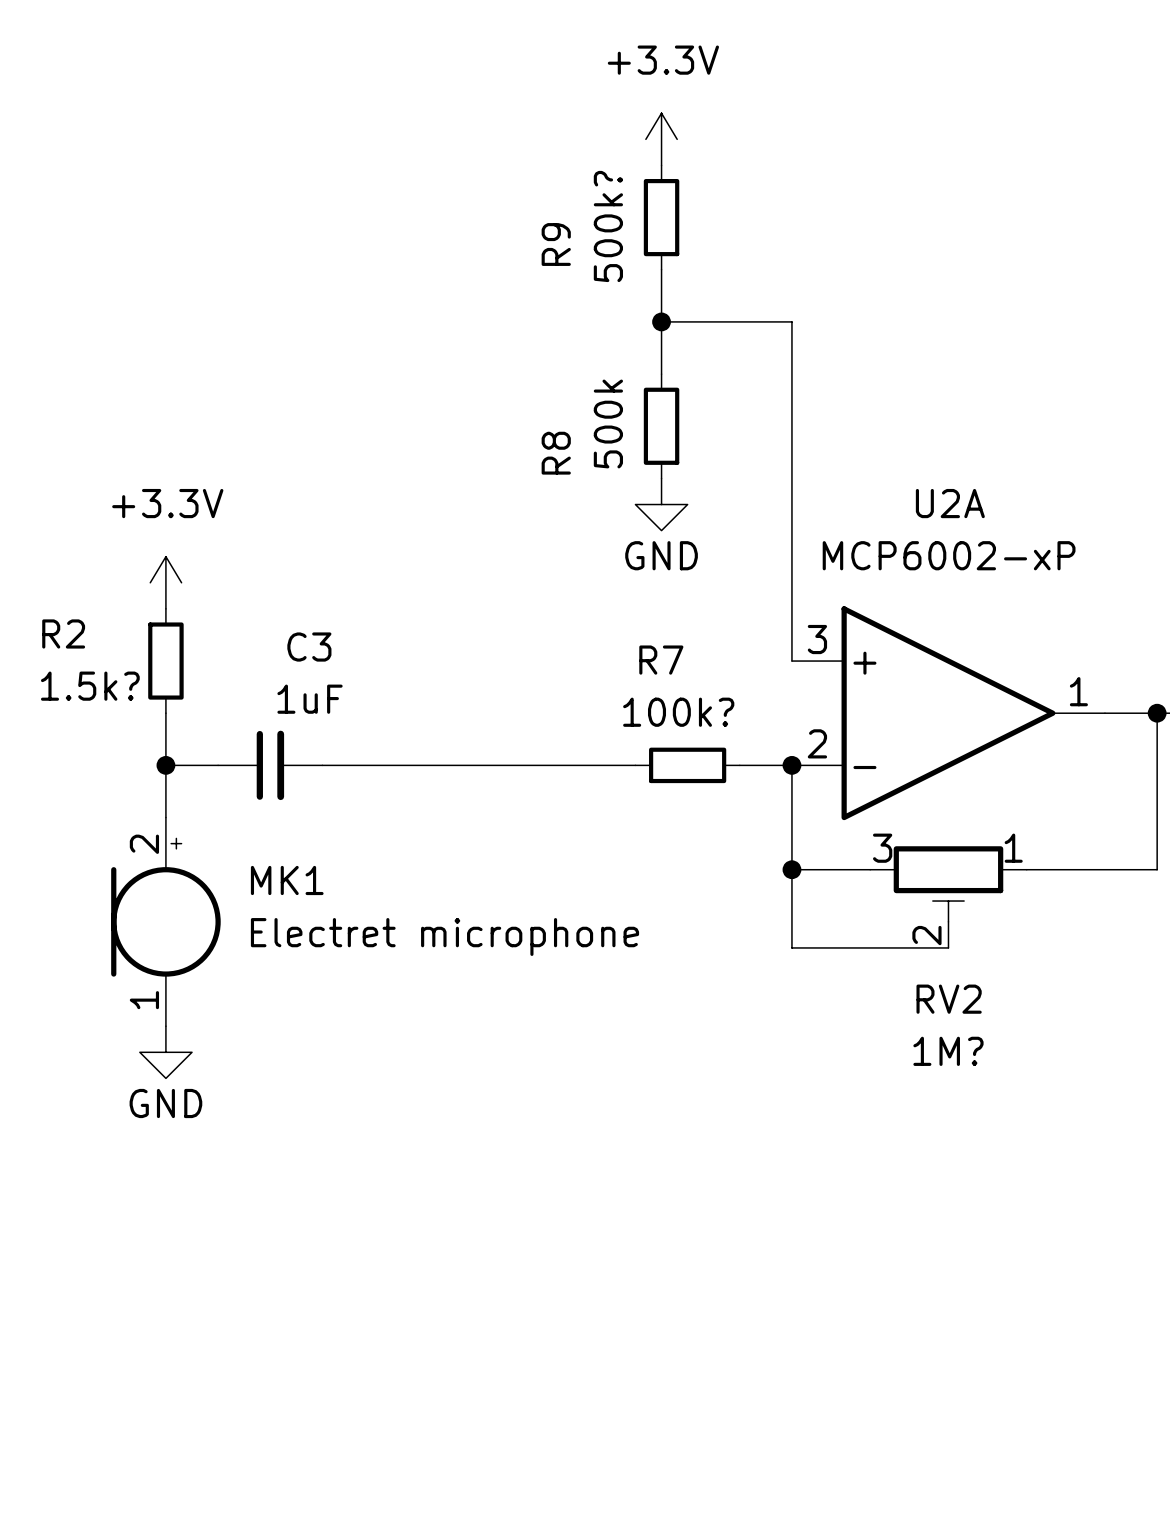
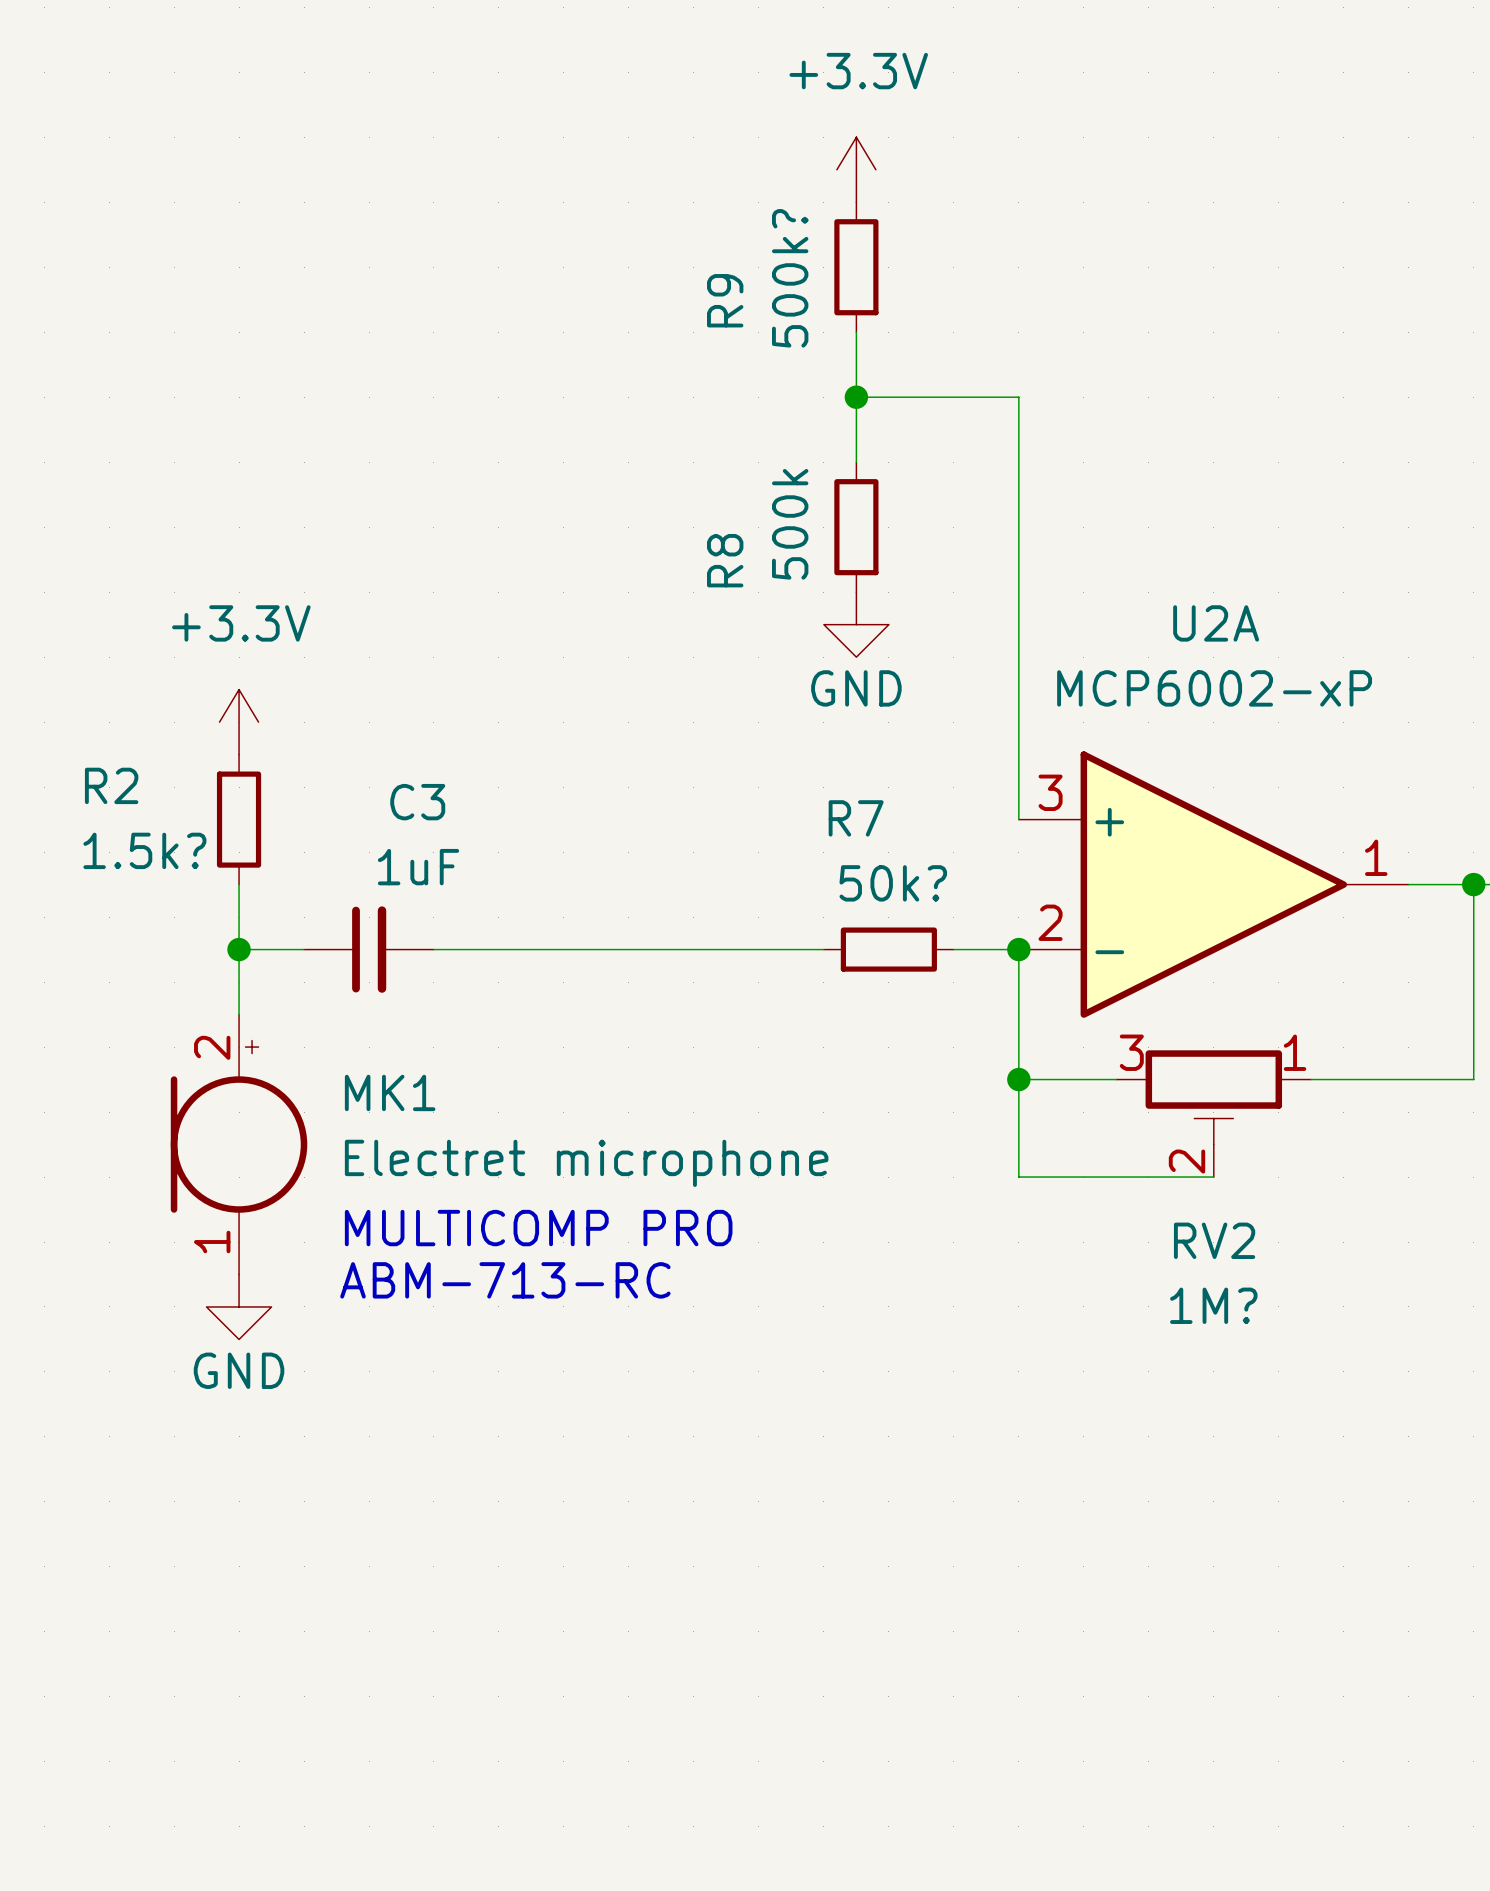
R7 value: 100k? (678, 712) -> 50k? (893, 883)
text: none -> MULTICOMP PRO (538, 1228)
text: none -> ABM-713-RC (505, 1280)

